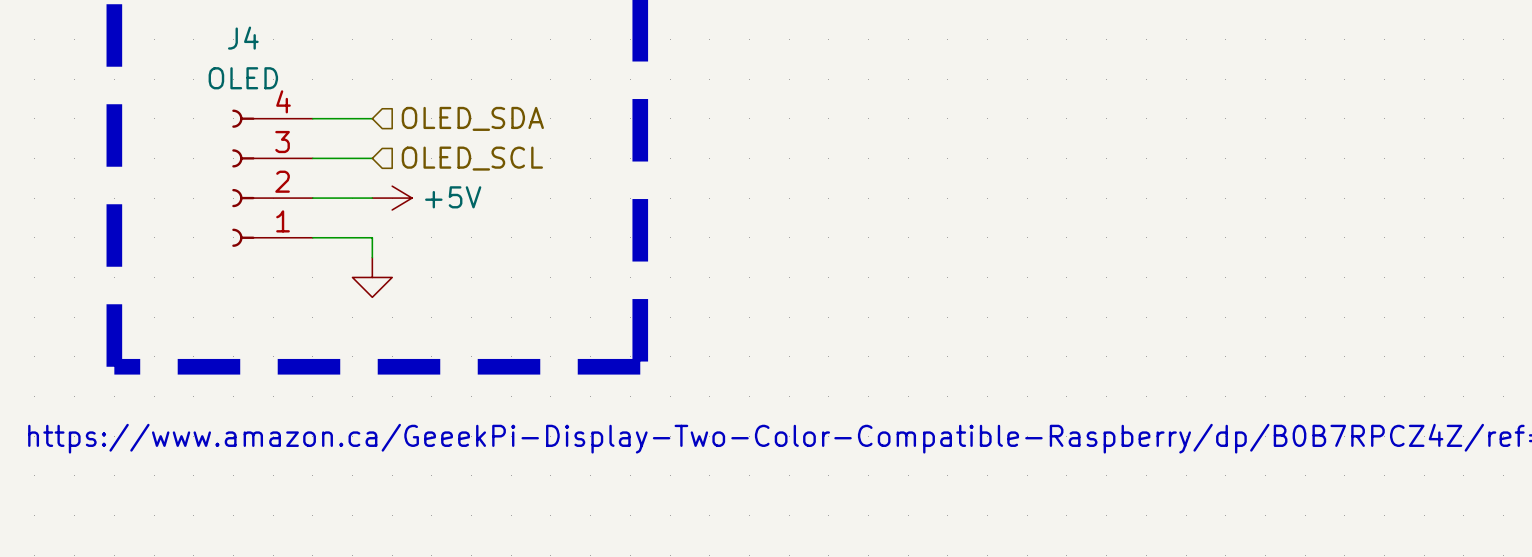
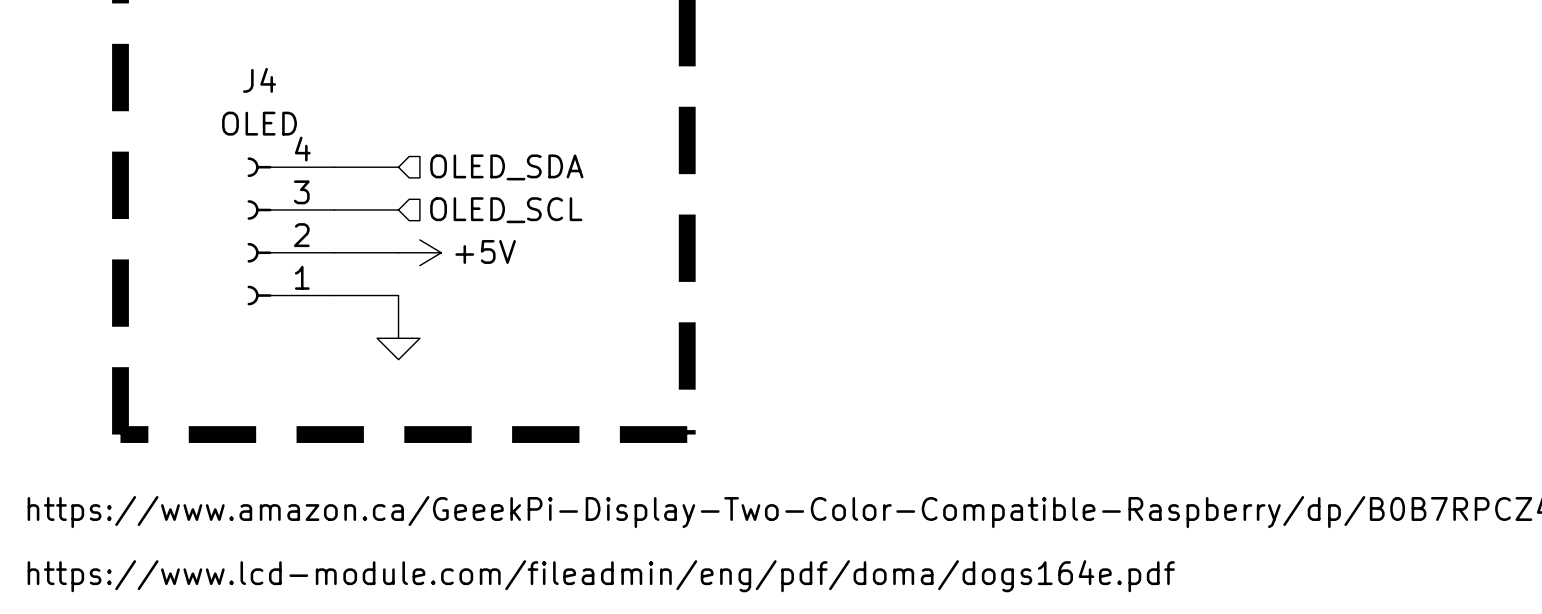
text: none -> https://www.lcd-module.com/fileadmin/eng/pdf/doma/dogs164e.pdf (601, 576)

